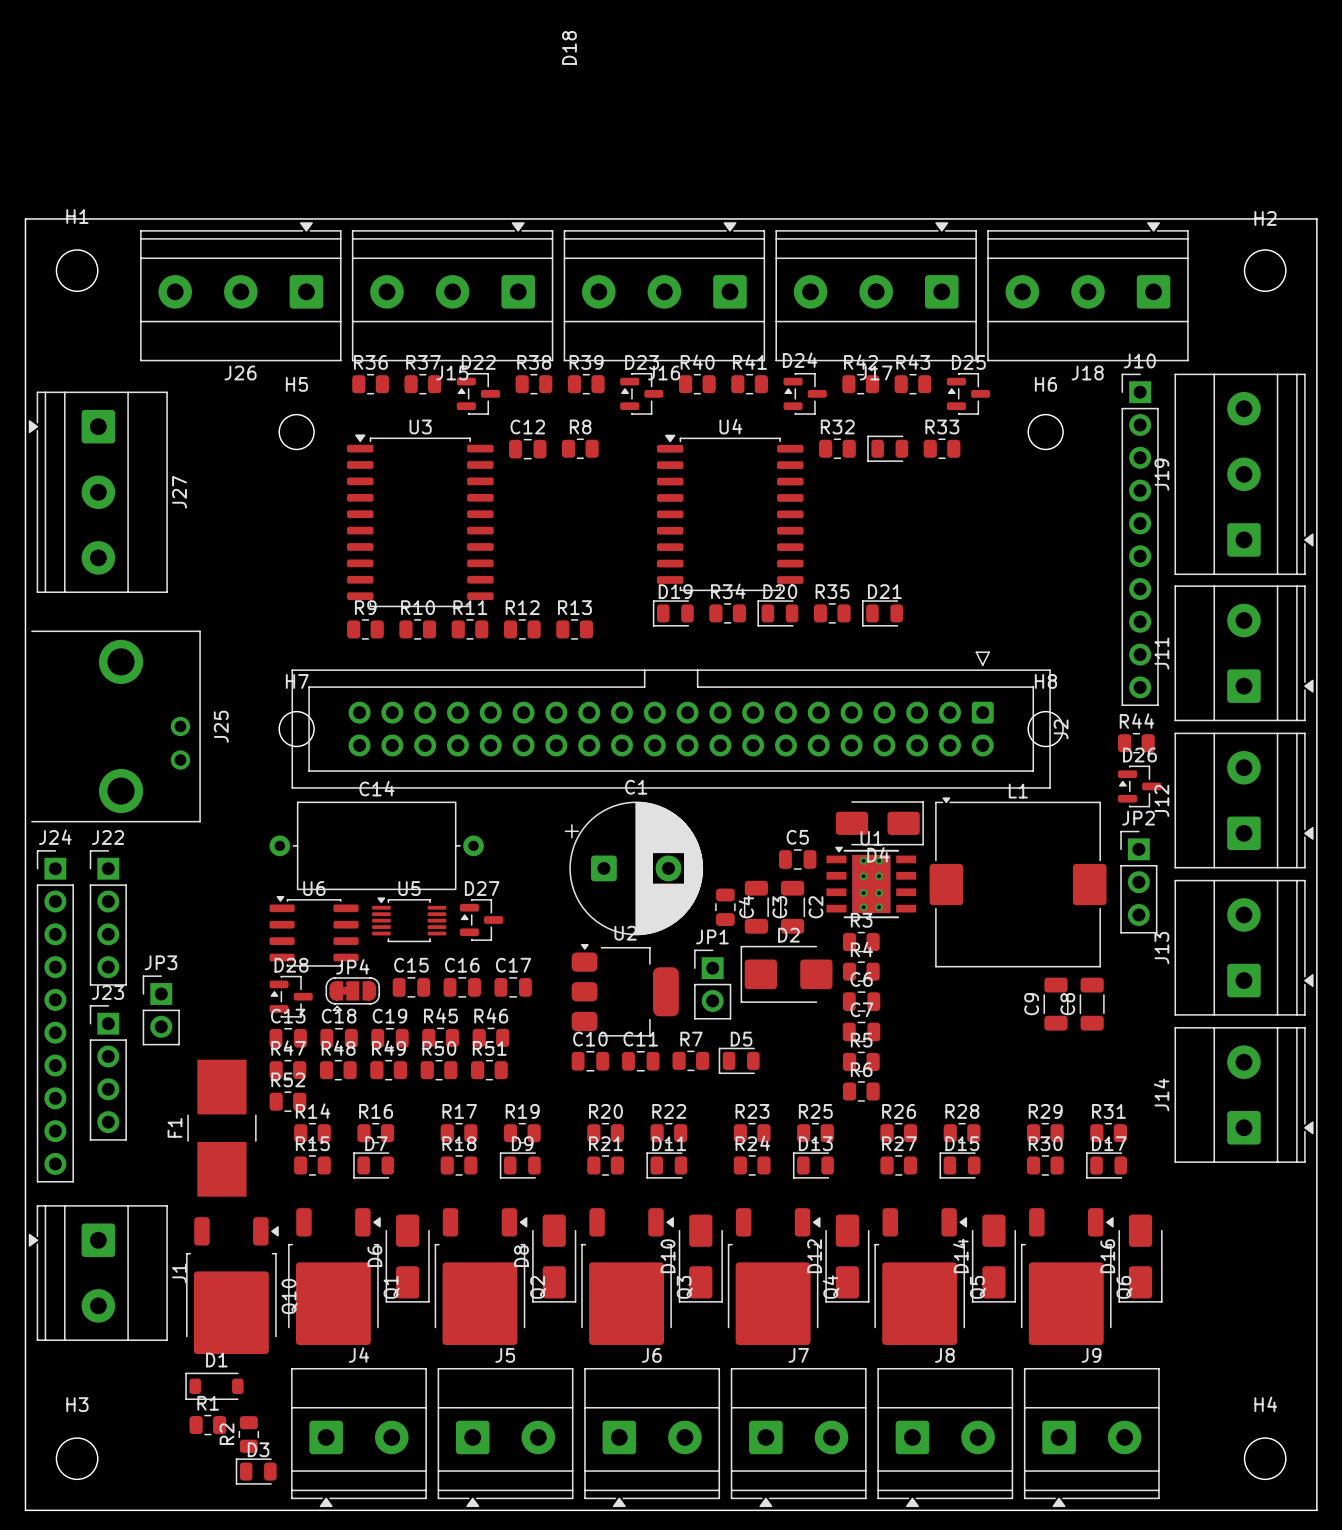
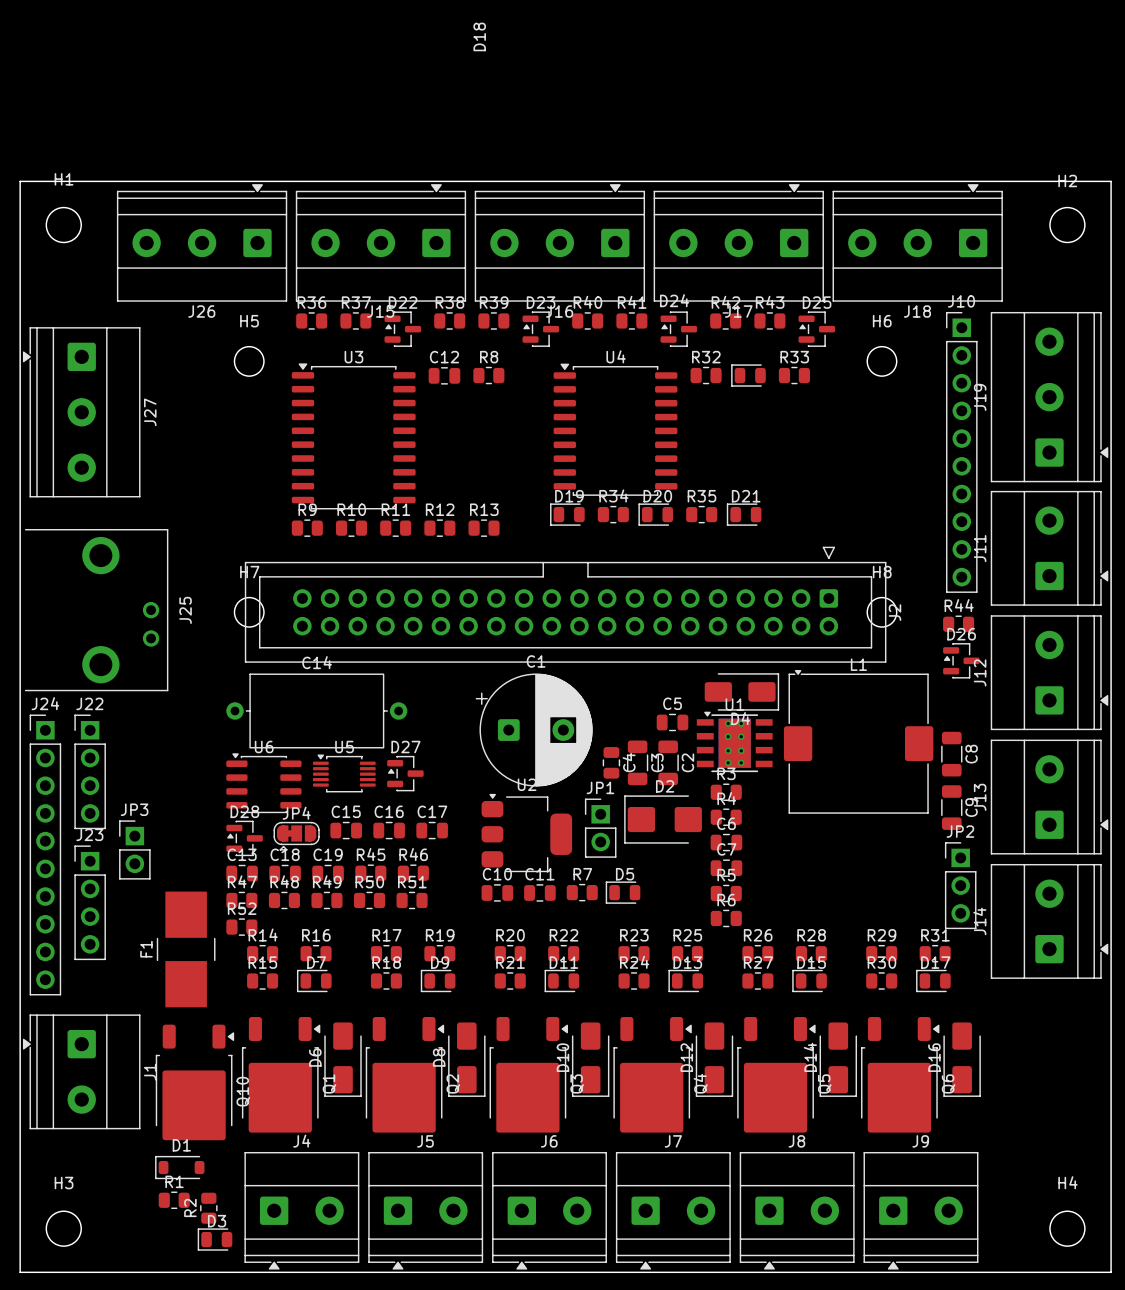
JP2 position: (1138, 882) -> (960, 885)
C9 name position: C9 (1031, 1004) -> C9 (971, 807)
C9 position: (1056, 1004) -> (951, 807)
C8 name position: C8 (1067, 1004) -> C8 (971, 754)
C8 position: (1092, 1004) -> (951, 754)

